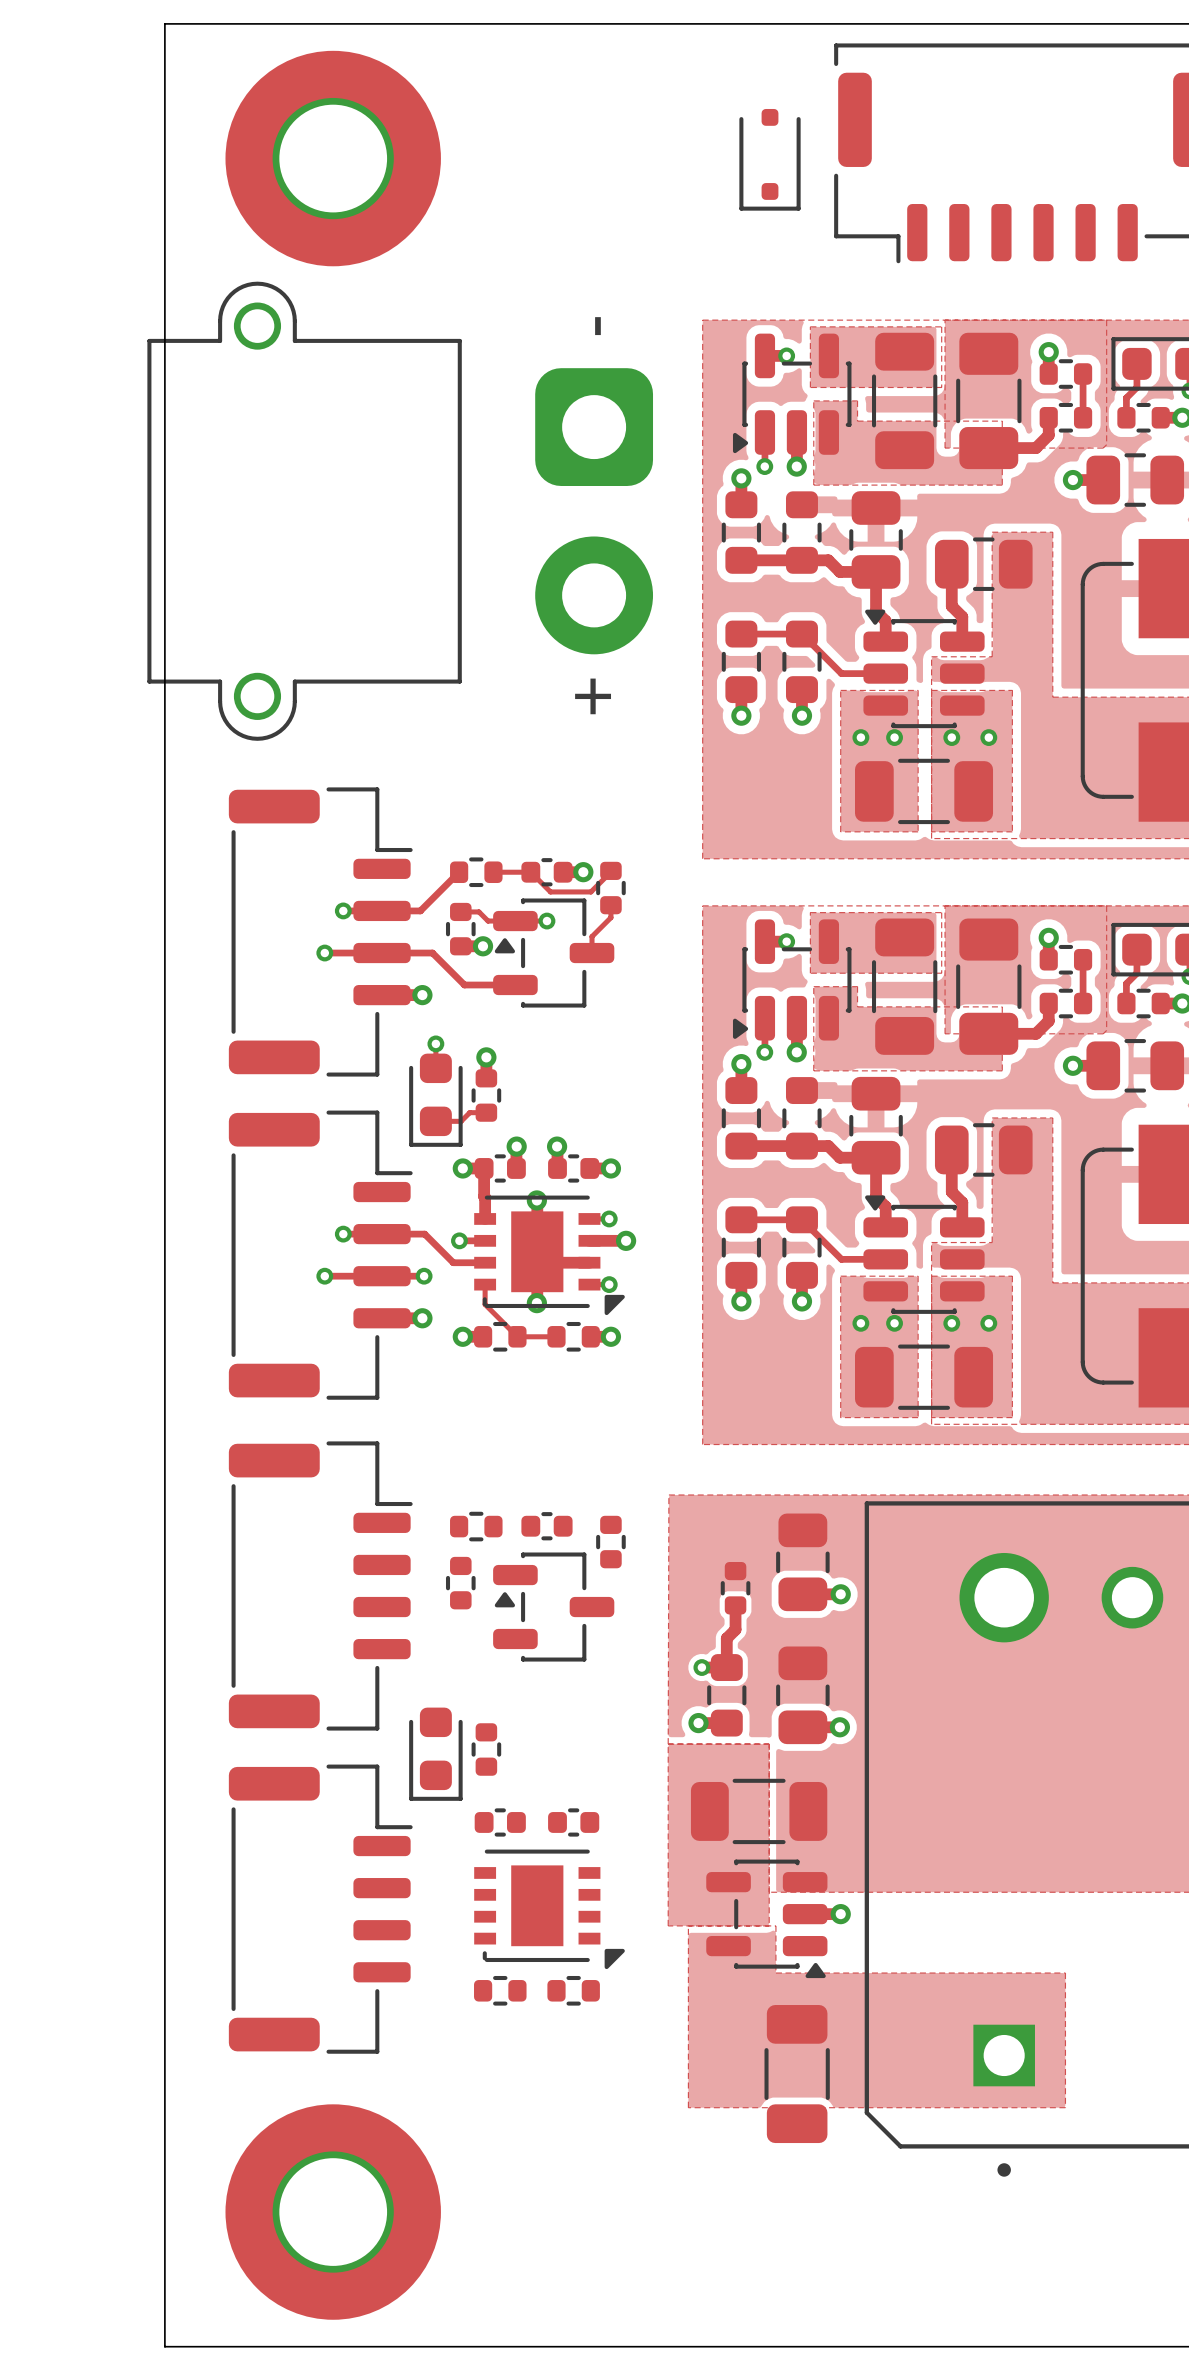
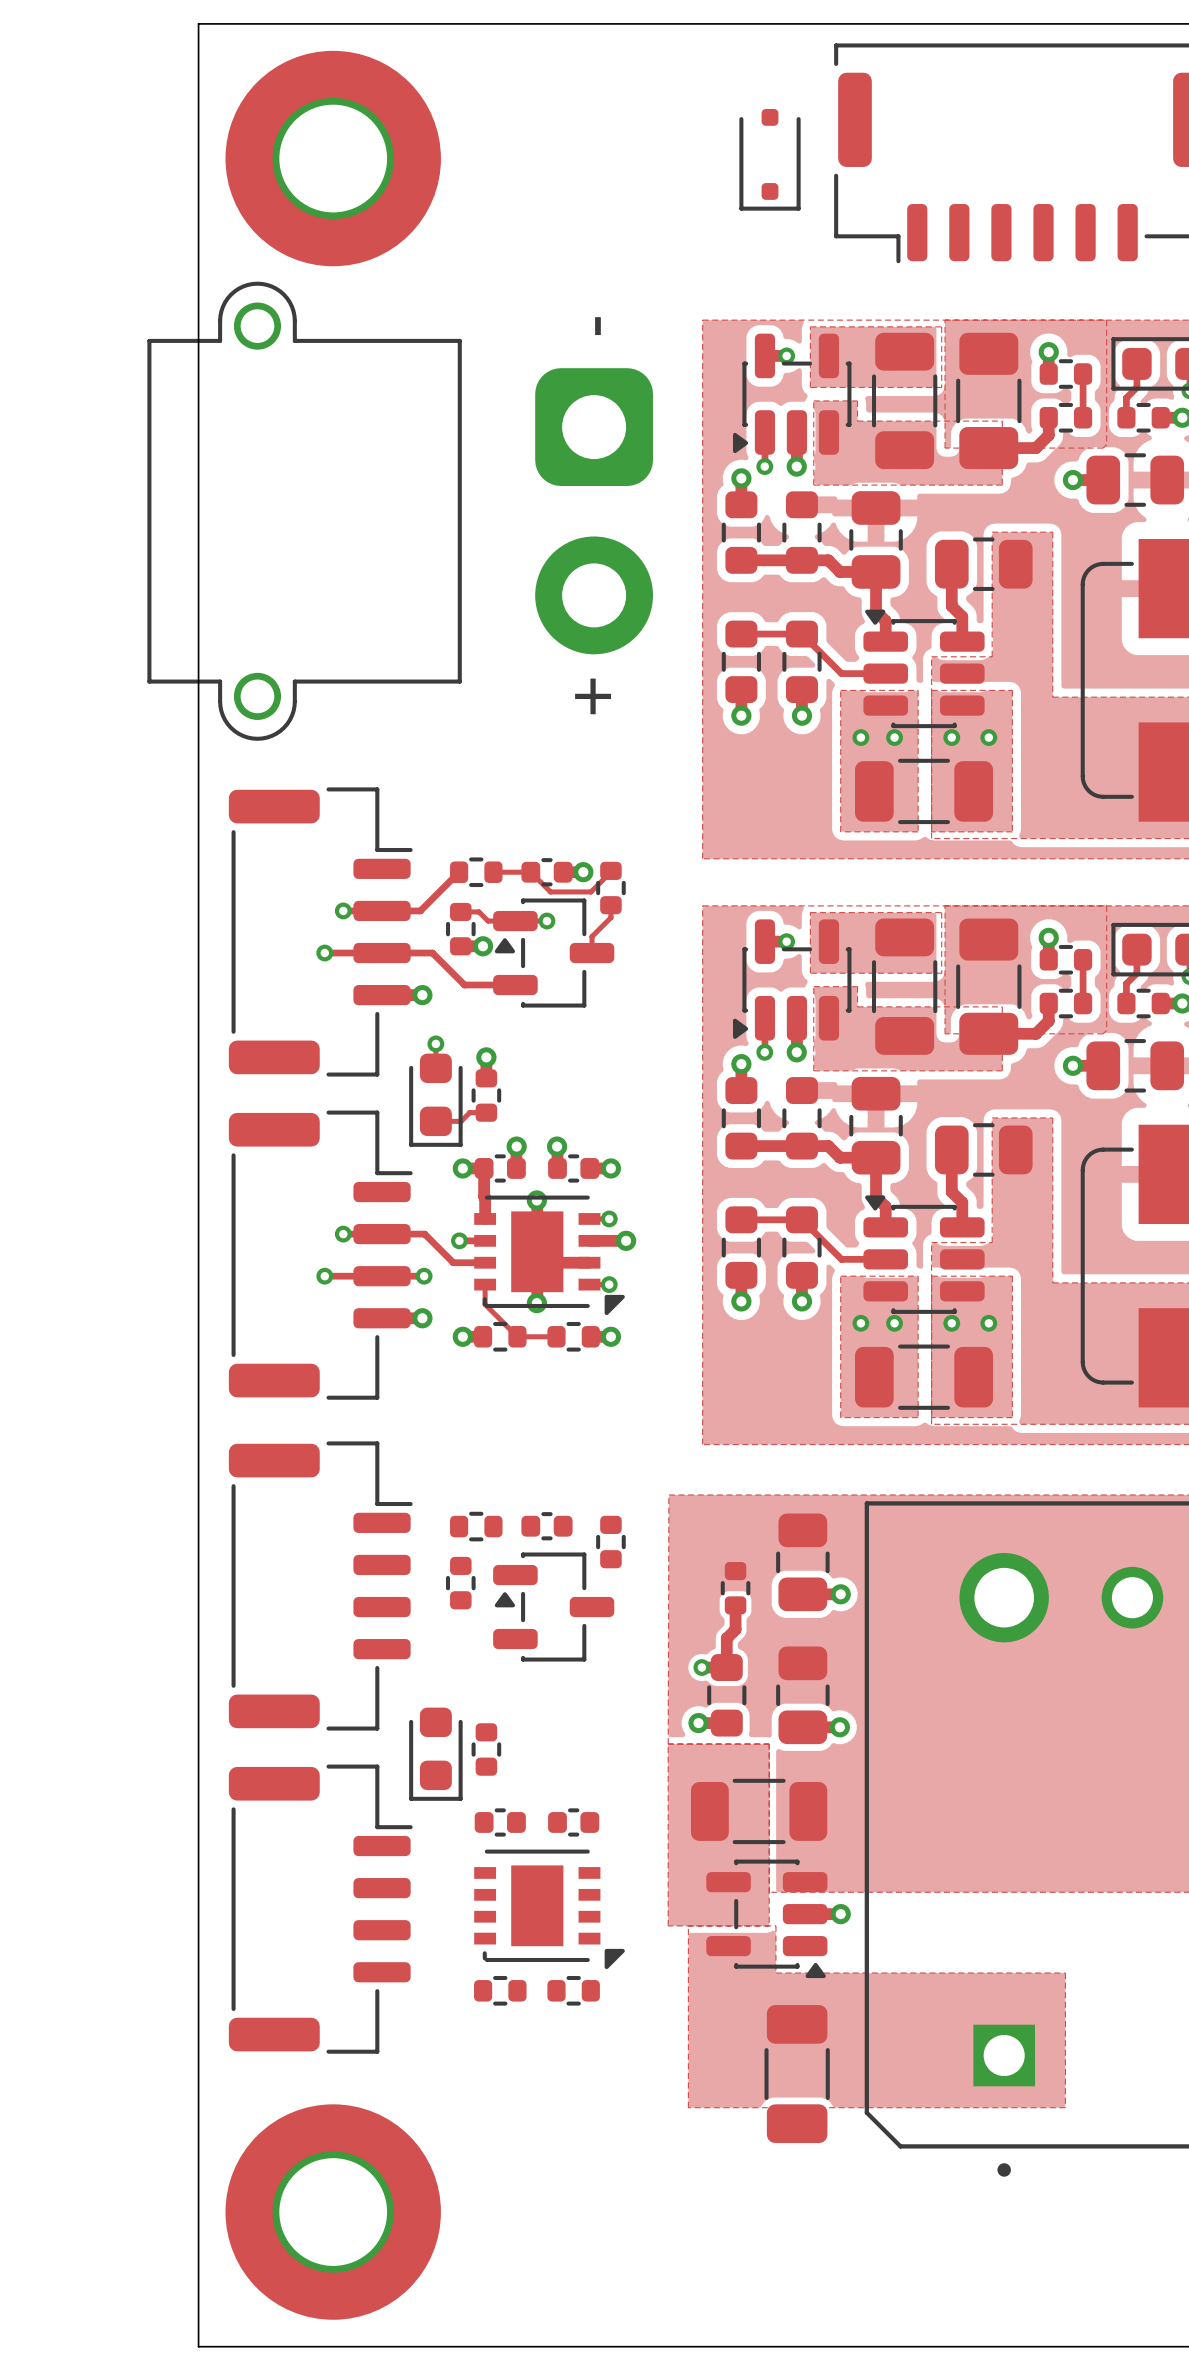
board edge: (198, 23) (164, 23) (164, 2346) (198, 2346) -> (198, 23) (198, 2346)

